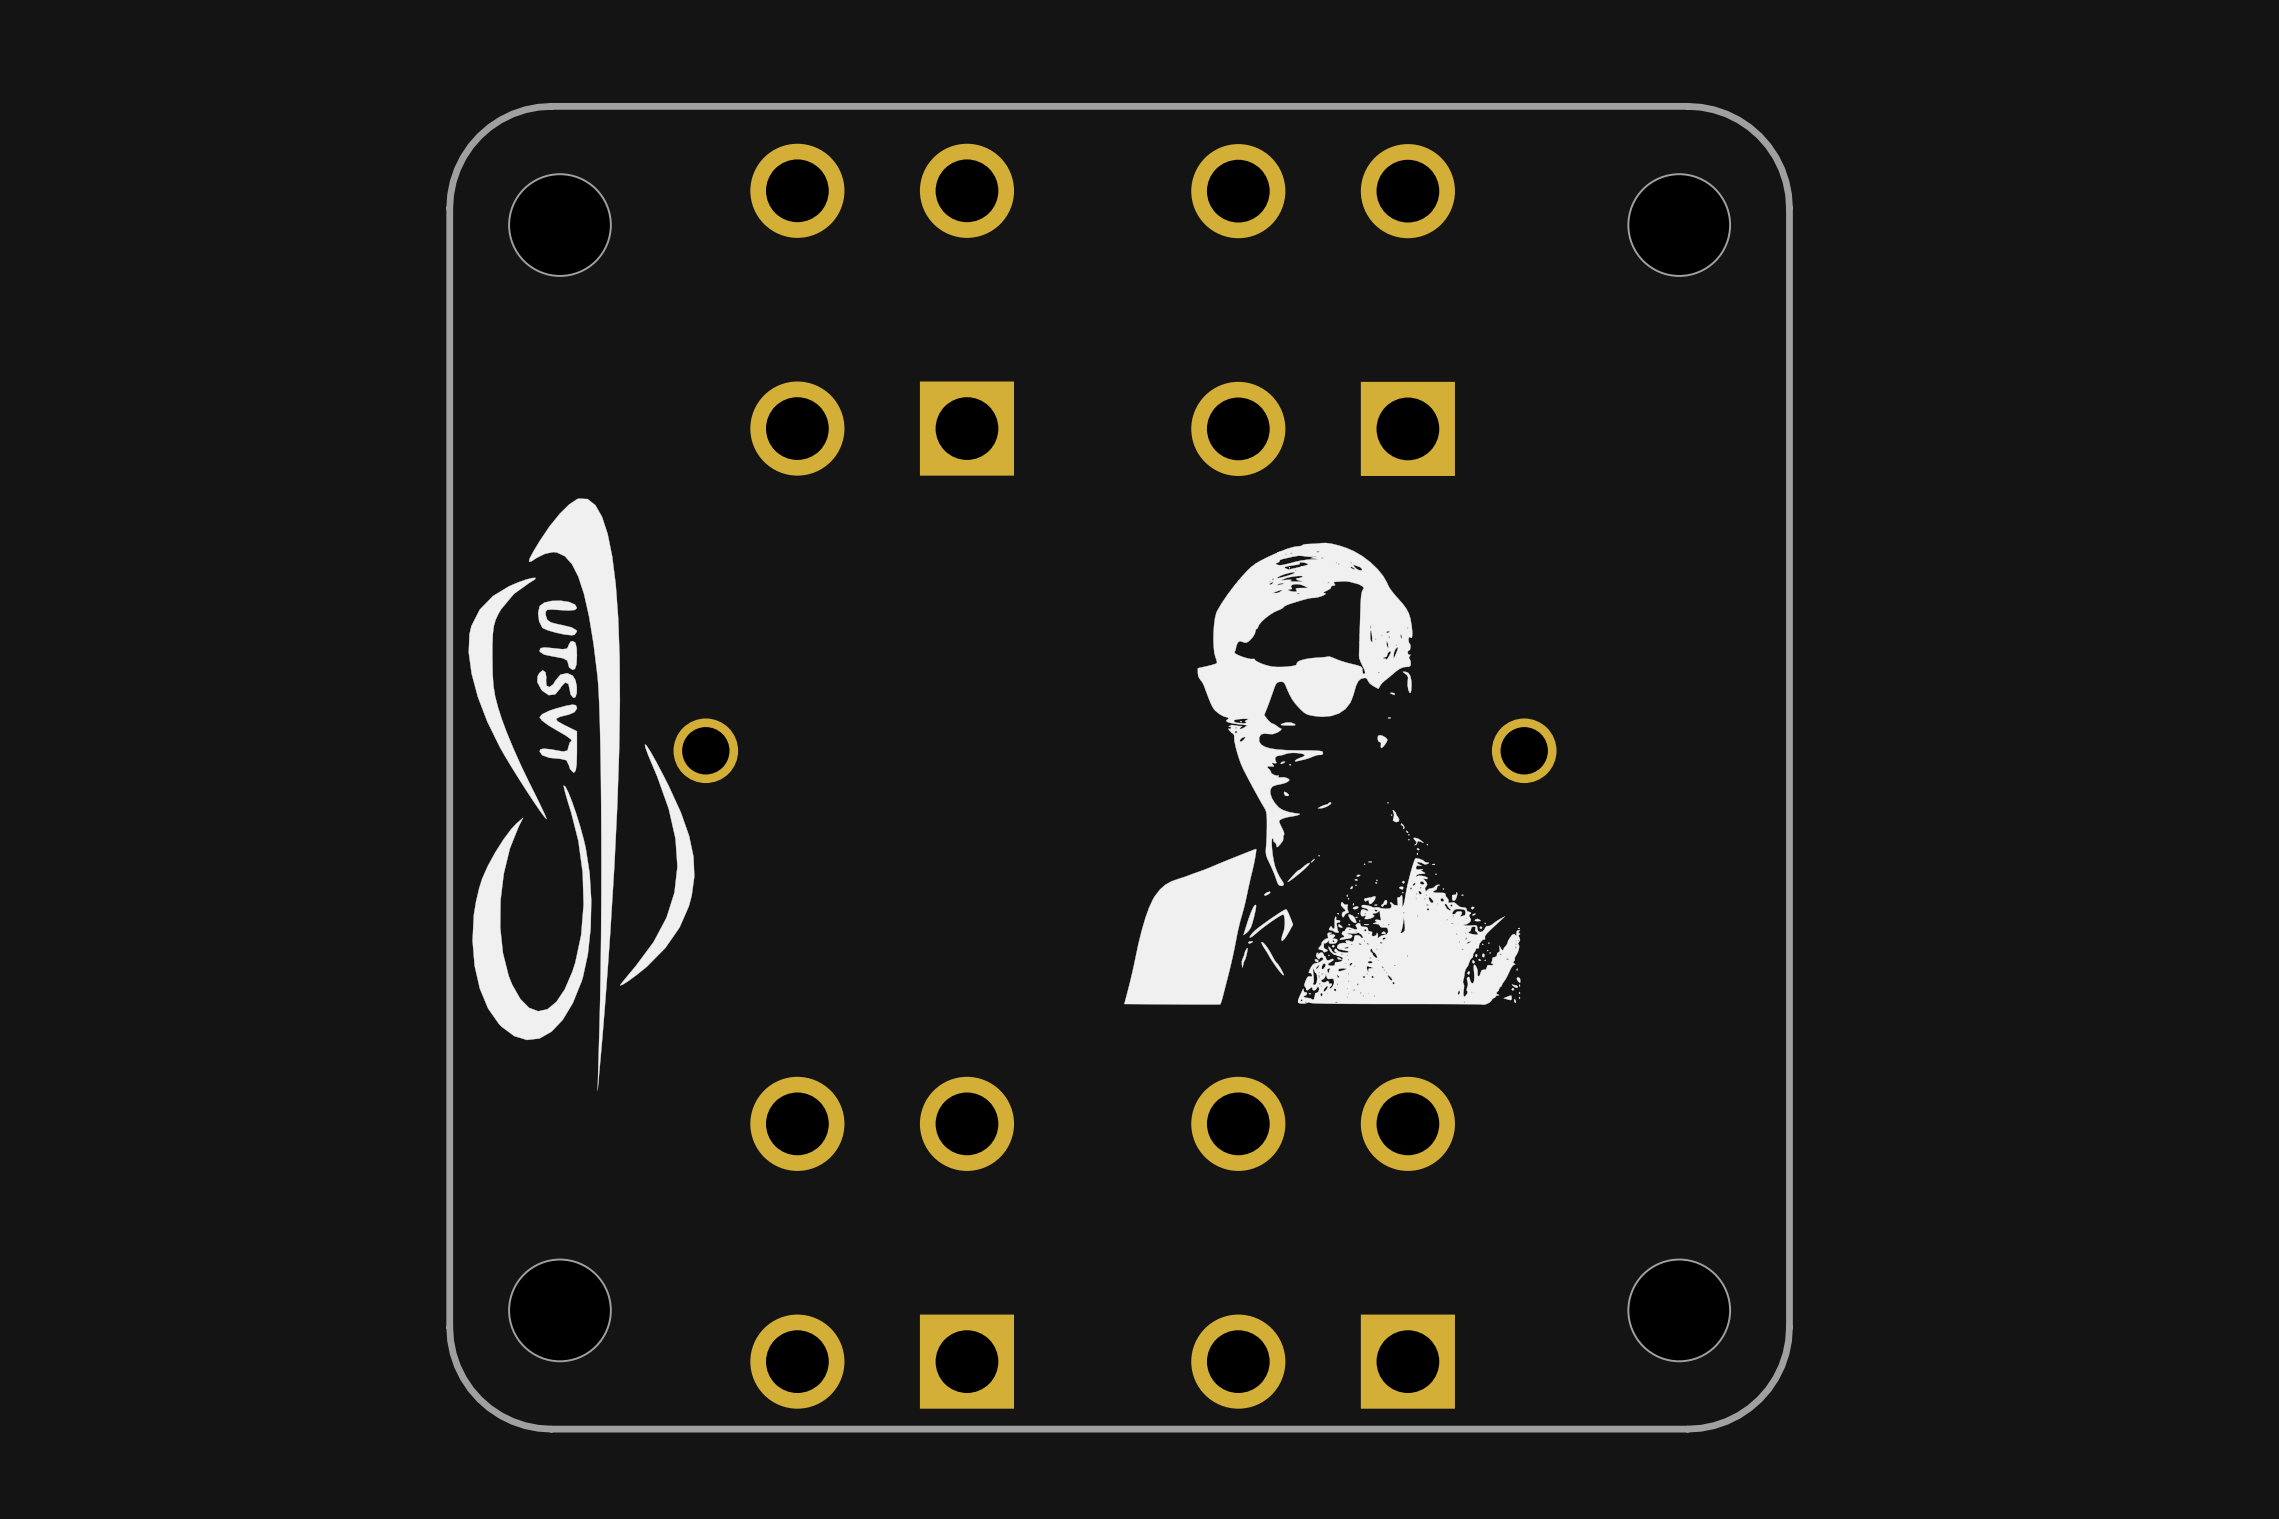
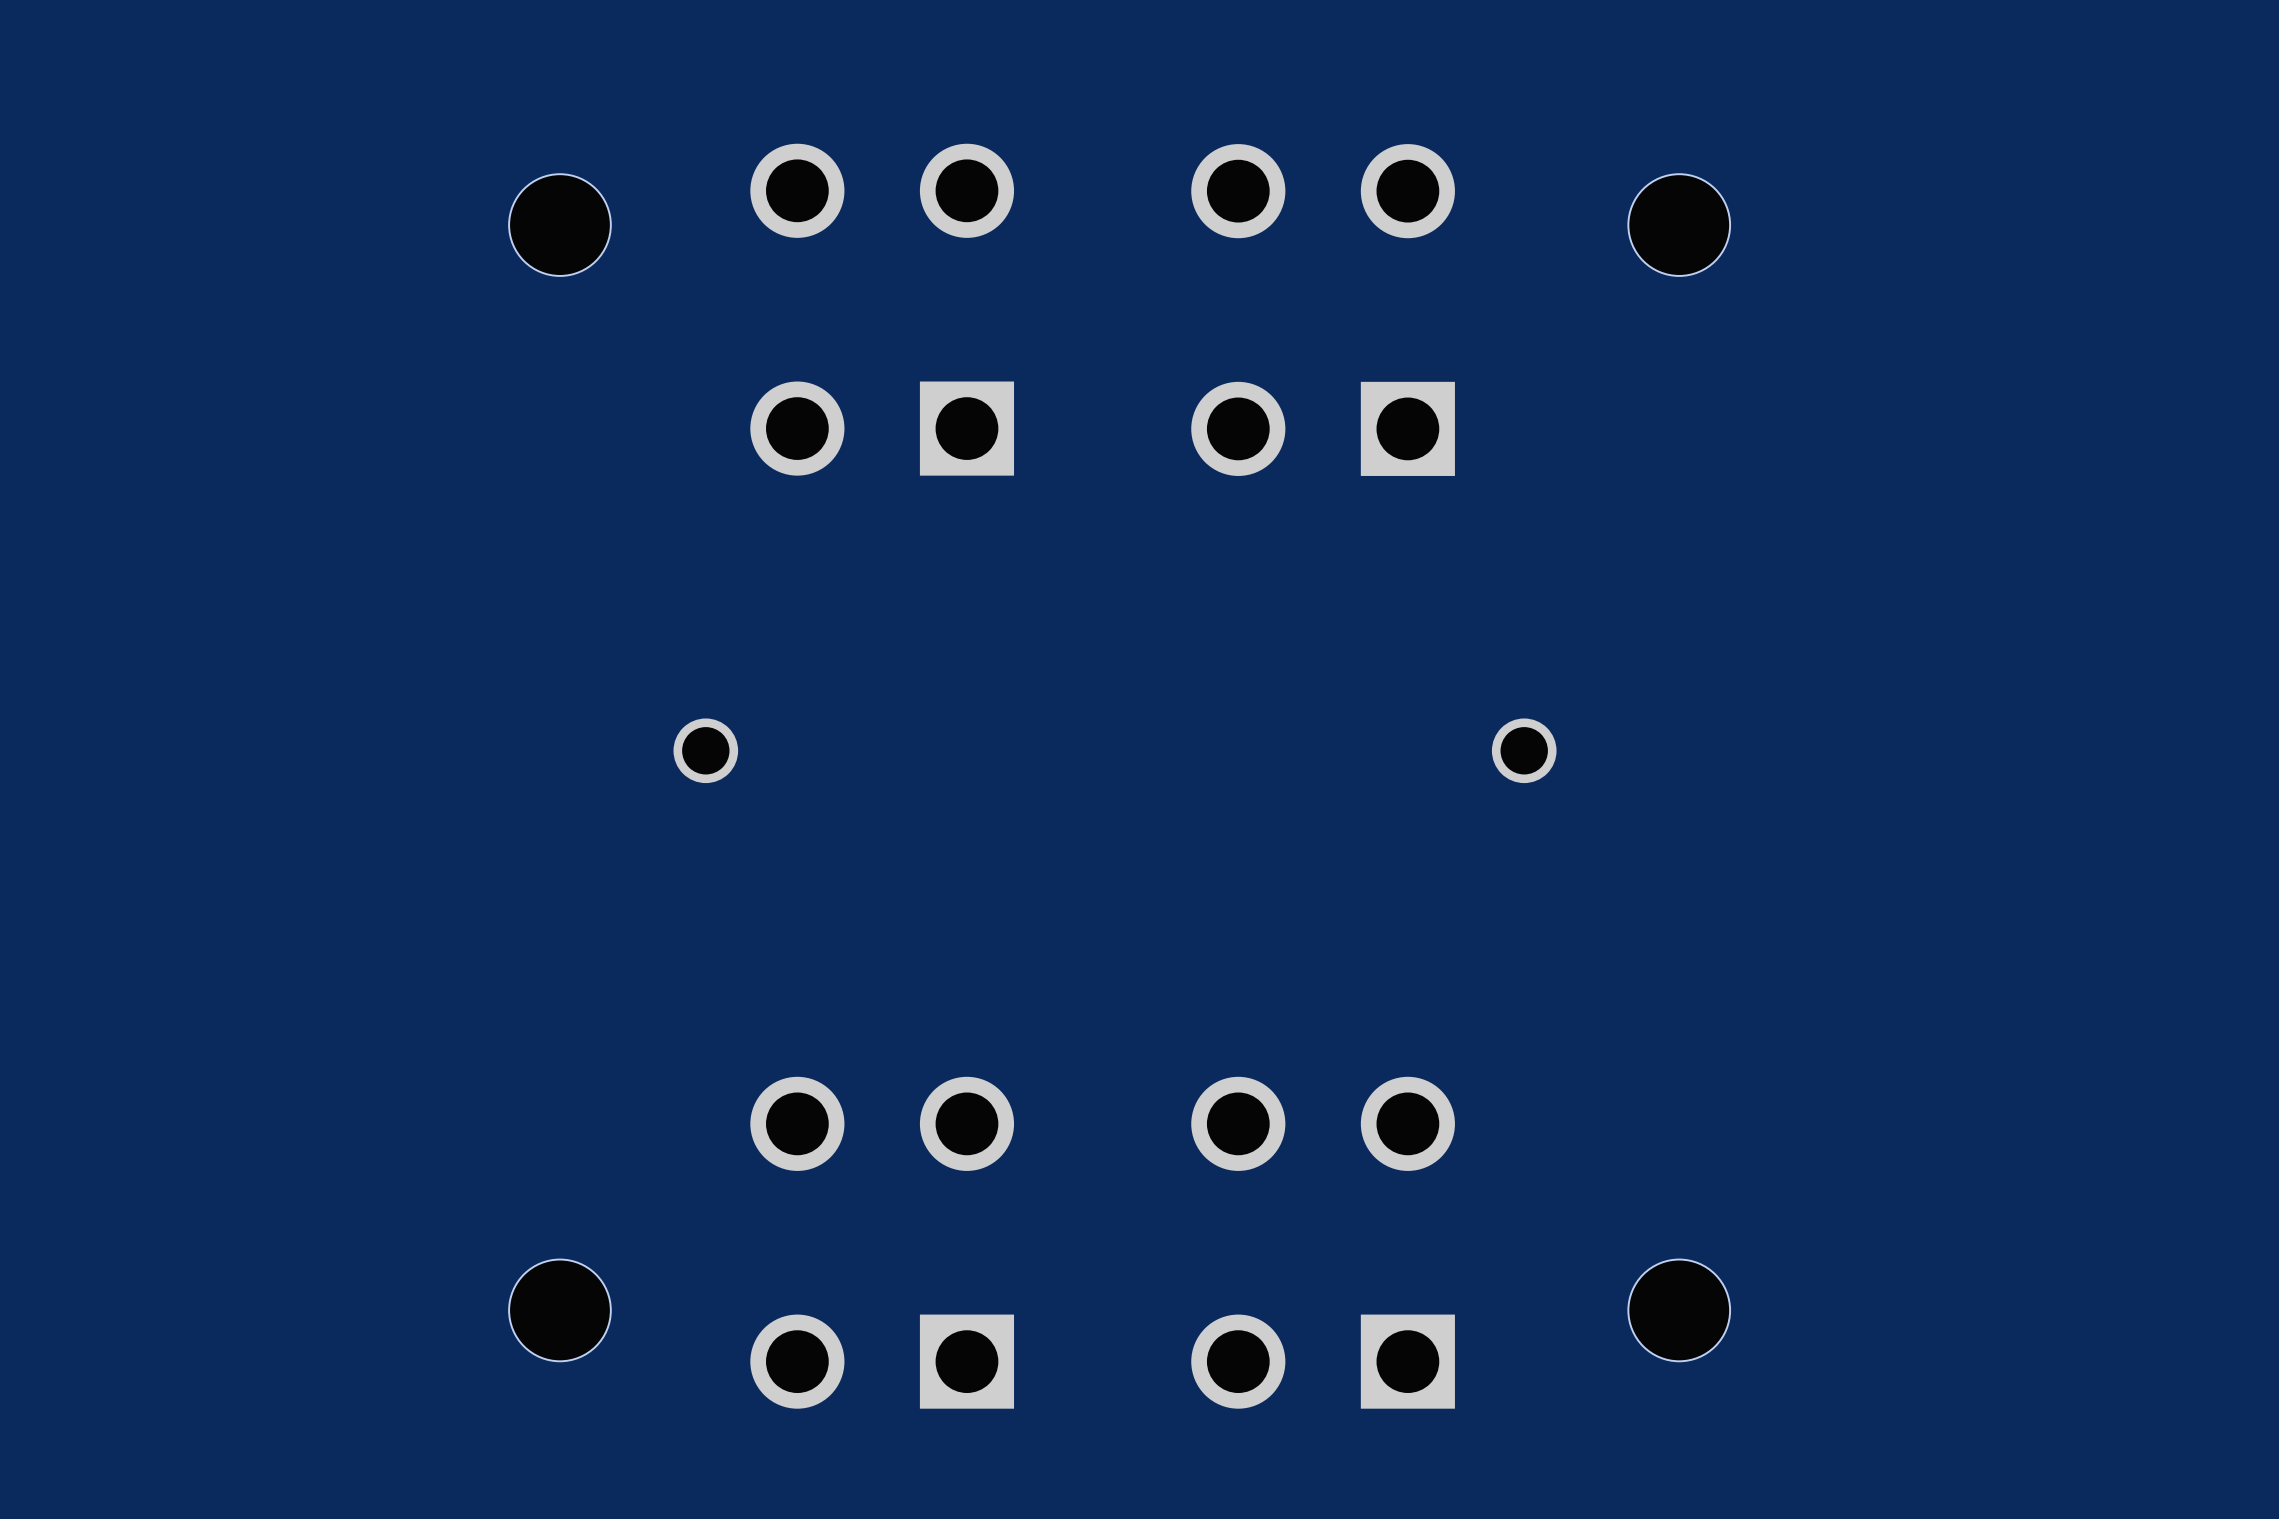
board edge: (1687, 106) (551, 106) (525, 109) (512, 114) (500, 119) (479, 136) (470, 146) (457, 169) (453, 181) (449, 208) (449, 1327) (453, 1353) (457, 1366) (470, 1389) (479, 1399) (489, 1408) (512, 1421) (538, 1428) (551, 1429) (1687, 1429) (1714, 1425) (1726, 1421) (1738, 1415) (1759, 1399) (1775, 1378) (1781, 1366) (1788, 1340) (1789, 1327) (1789, 208) (1785, 181) (1781, 169) (1775, 157) (1759, 136) (1738, 119) (1726, 114) (1714, 109) (1687, 106) -> none
drawing: [468, 498, 695, 1091] -> none
drawing: [1124, 542, 1521, 1005] -> none

